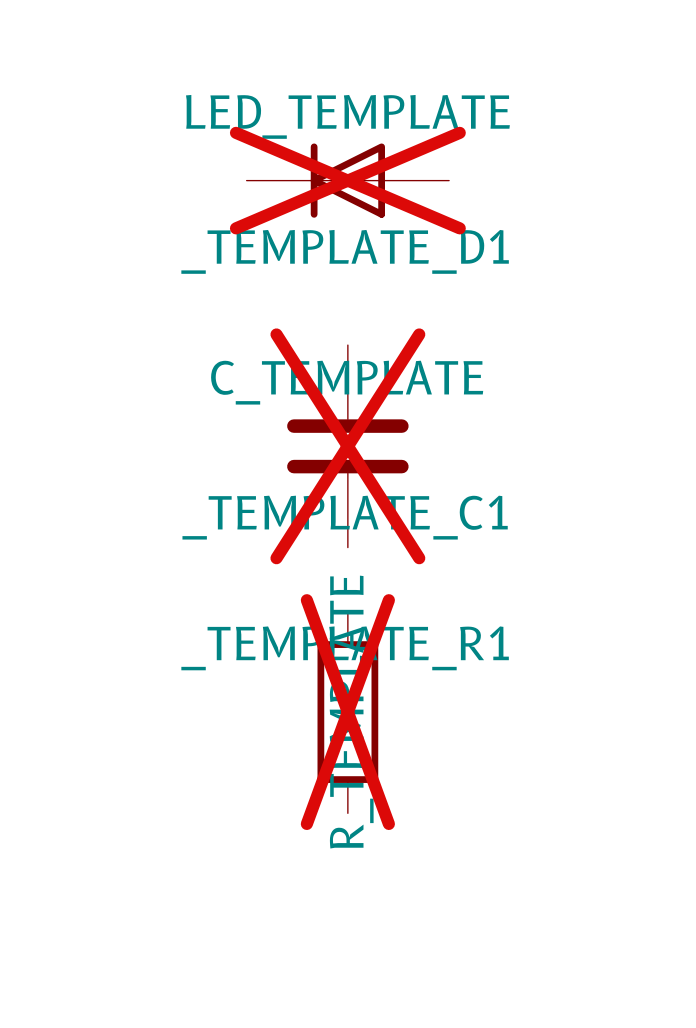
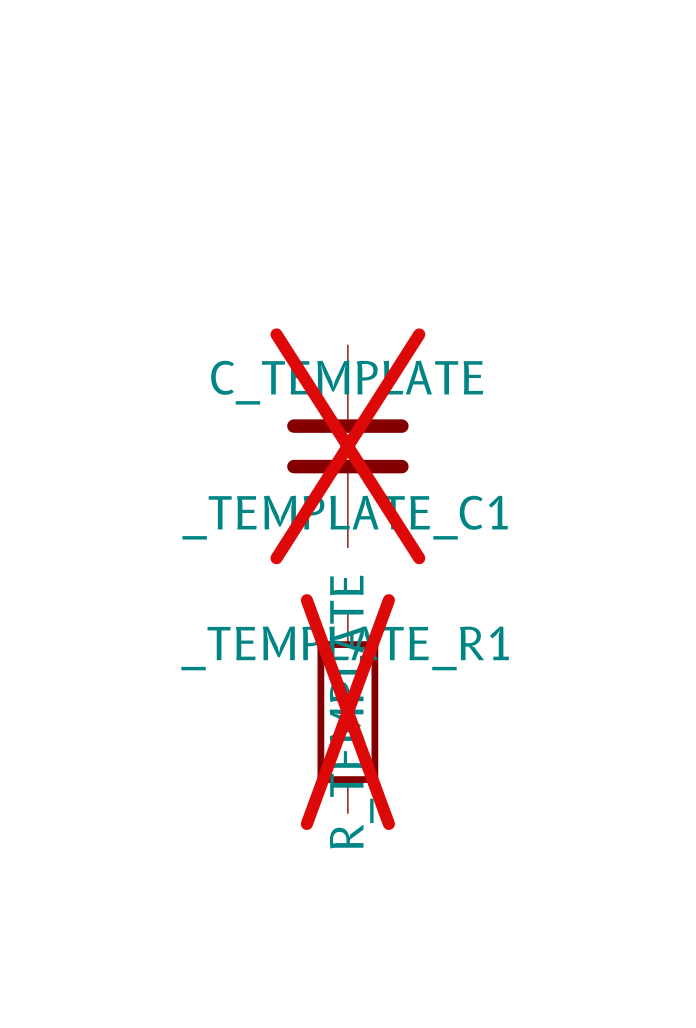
_TEMPLATE_D1: LED_TEMPLATE (347, 180) -> none

